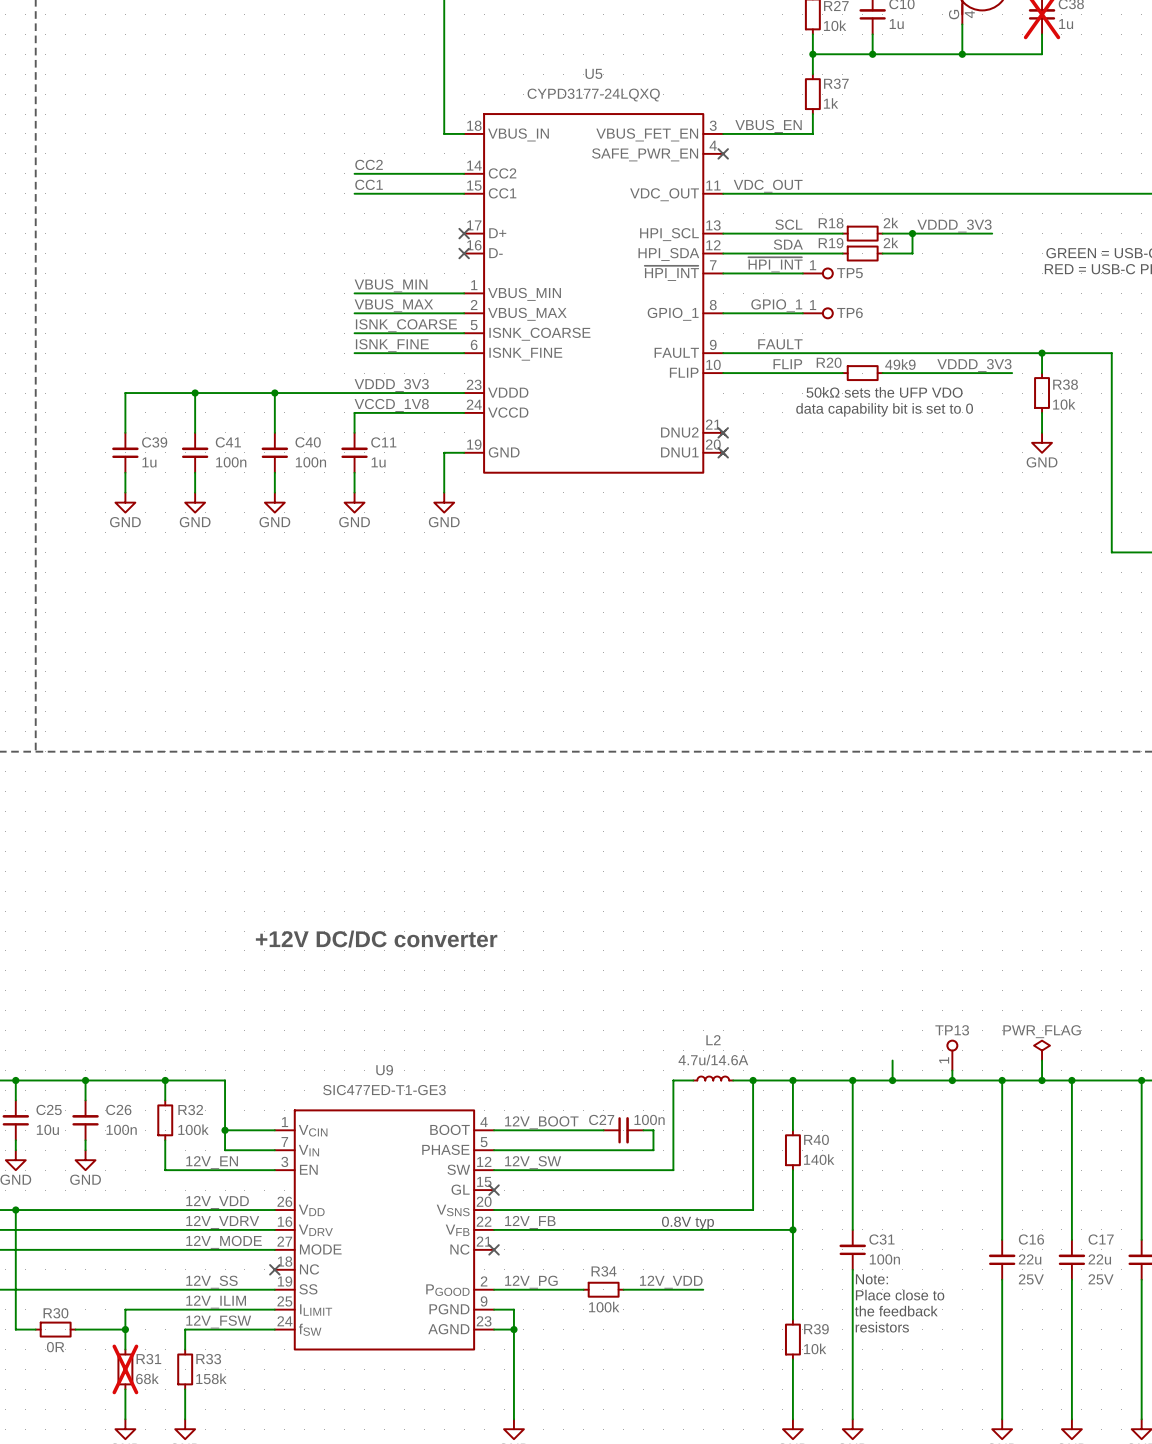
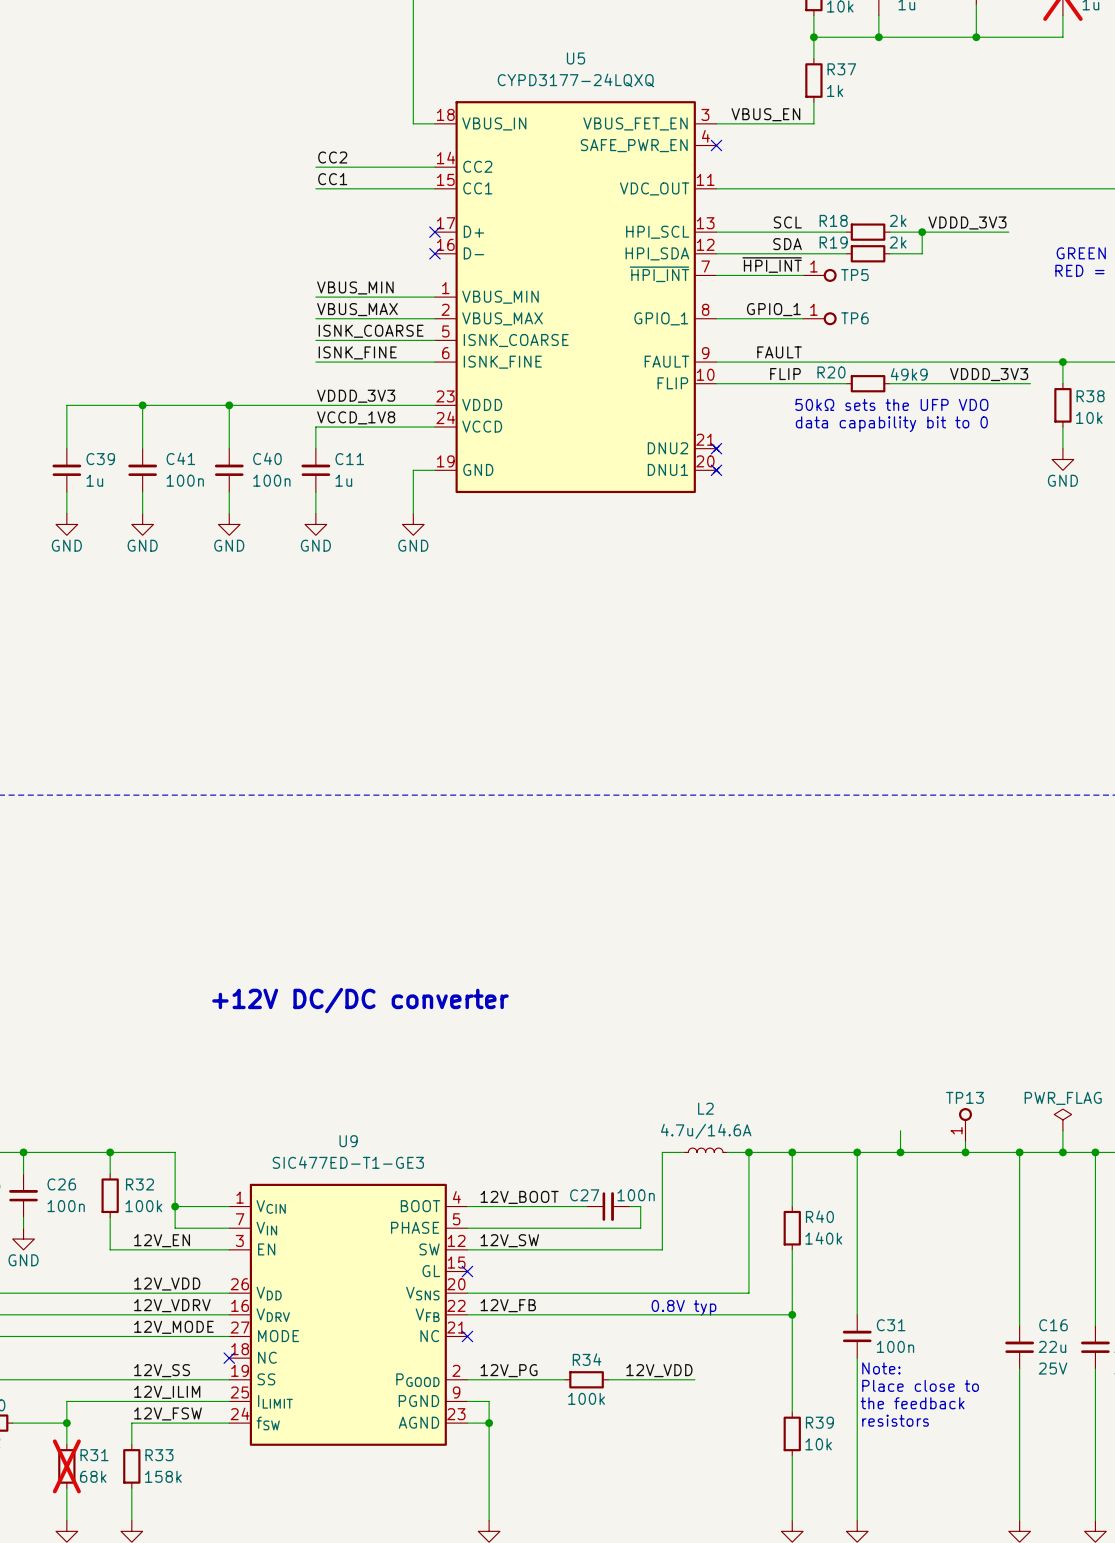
label: VDC_OUT (768, 186) -> none
text: data capability bit is set to 0 (884, 409) -> data capability bit to 0 (891, 424)

